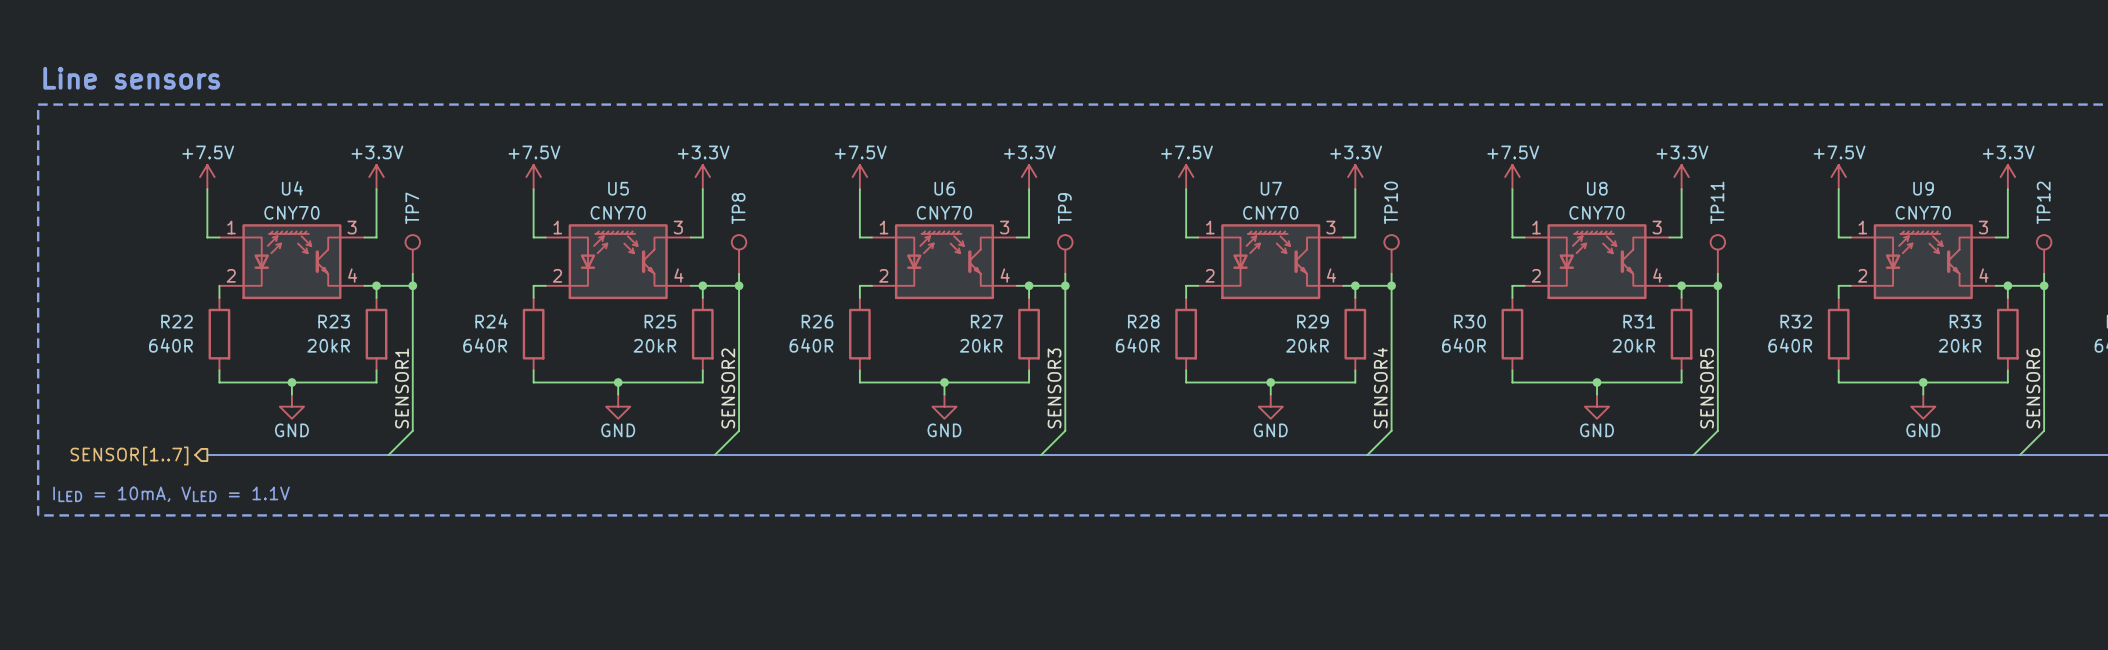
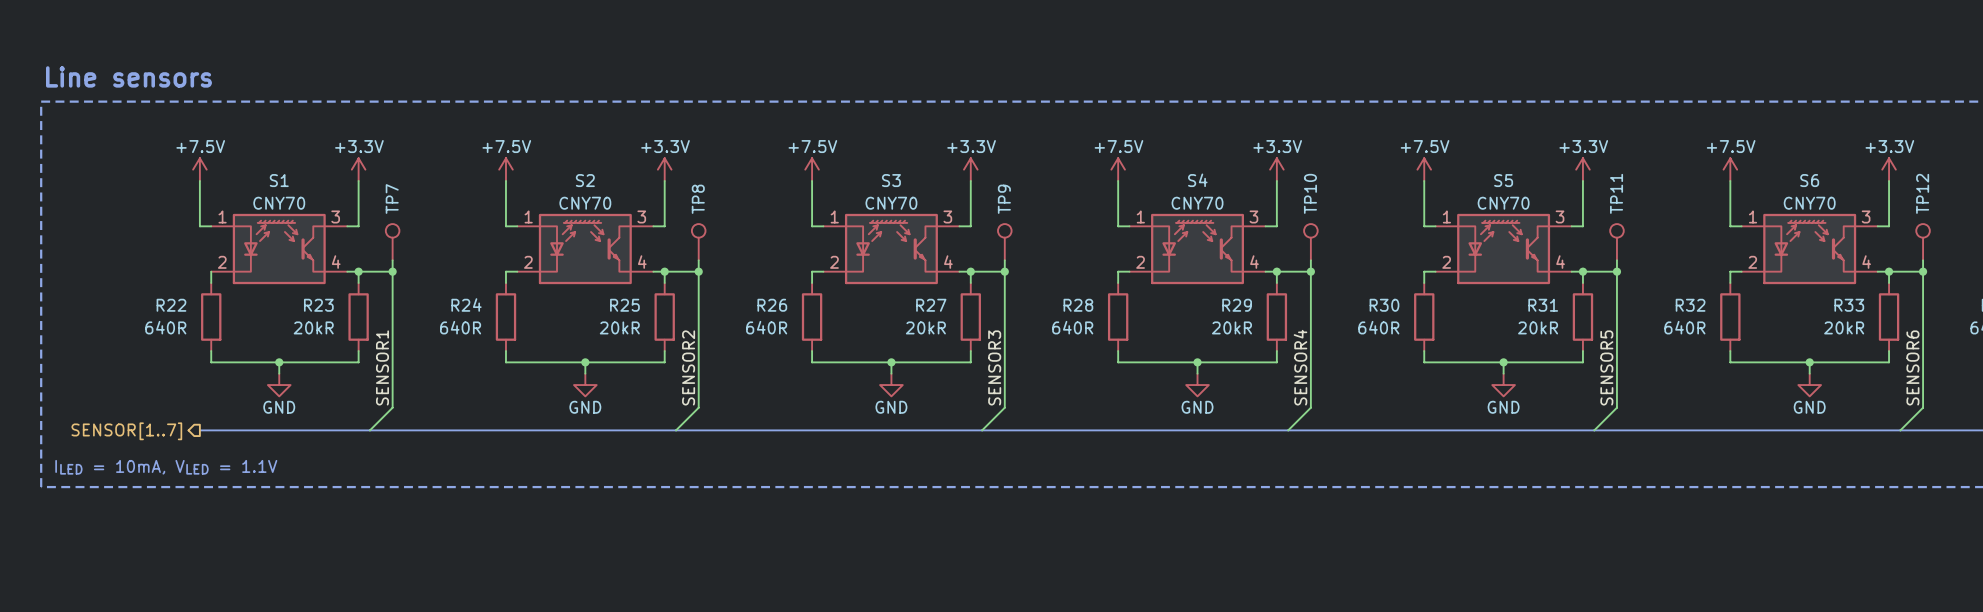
U4 name: U4 (292, 188) -> S1 (279, 180)
U5 name: U5 (618, 188) -> S2 (585, 180)
U6 name: U6 (944, 188) -> S3 (891, 180)
U7 name: U7 (1271, 188) -> S4 (1197, 180)
U8 name: U8 (1597, 188) -> S5 (1503, 180)
U9 name: U9 (1923, 188) -> S6 (1809, 180)

